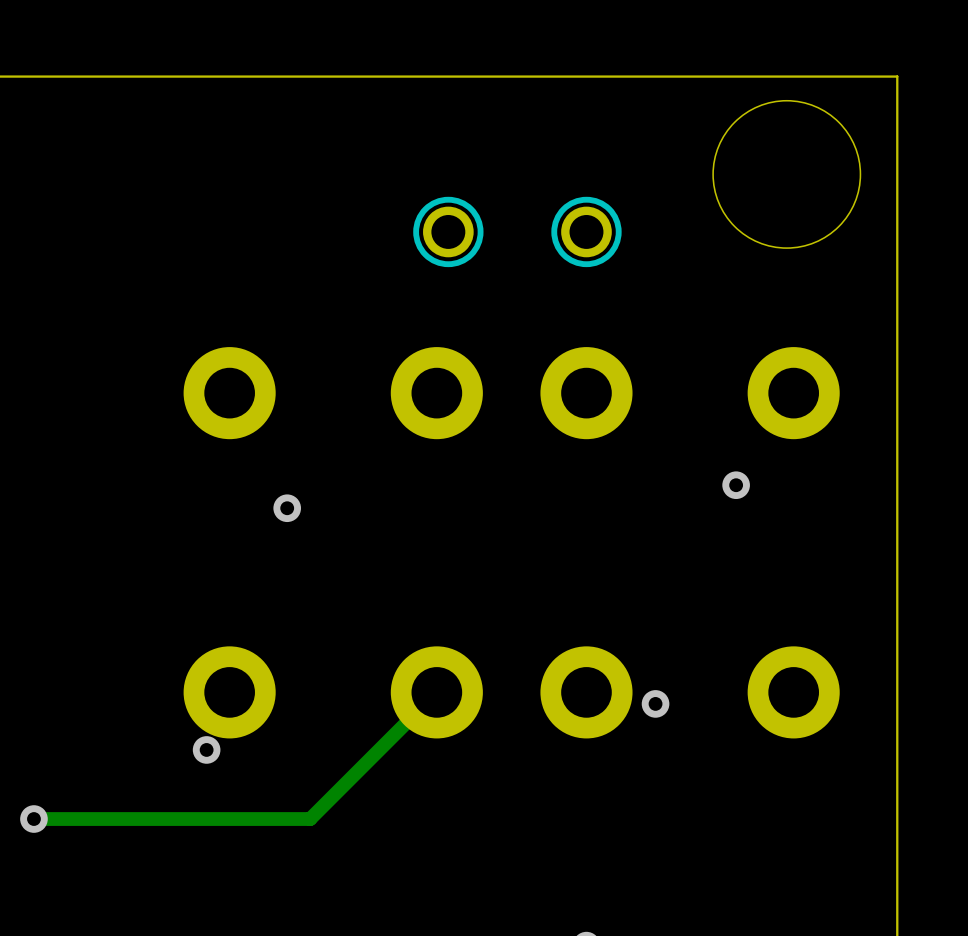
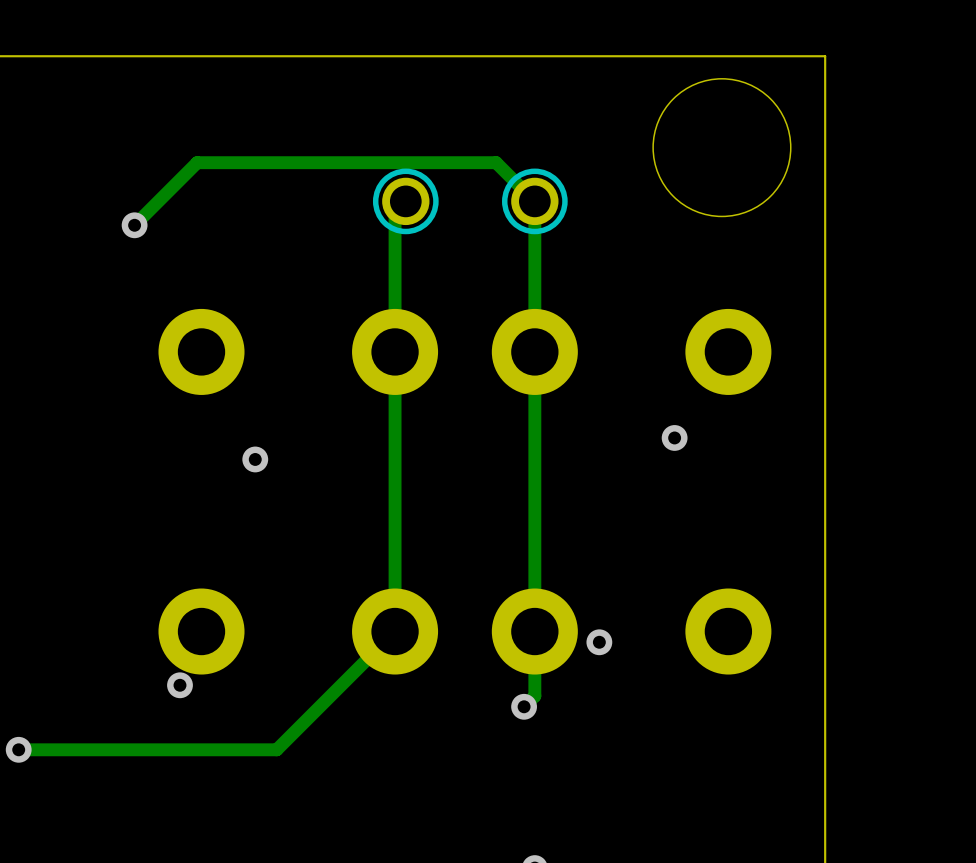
track: none -> (405, 201) (395, 212) (395, 631)
track: none -> (134, 225) (197, 162) (496, 162) (534, 201) (534, 696) (524, 706)
via: none -> (134, 225)
via: none -> (524, 706)

